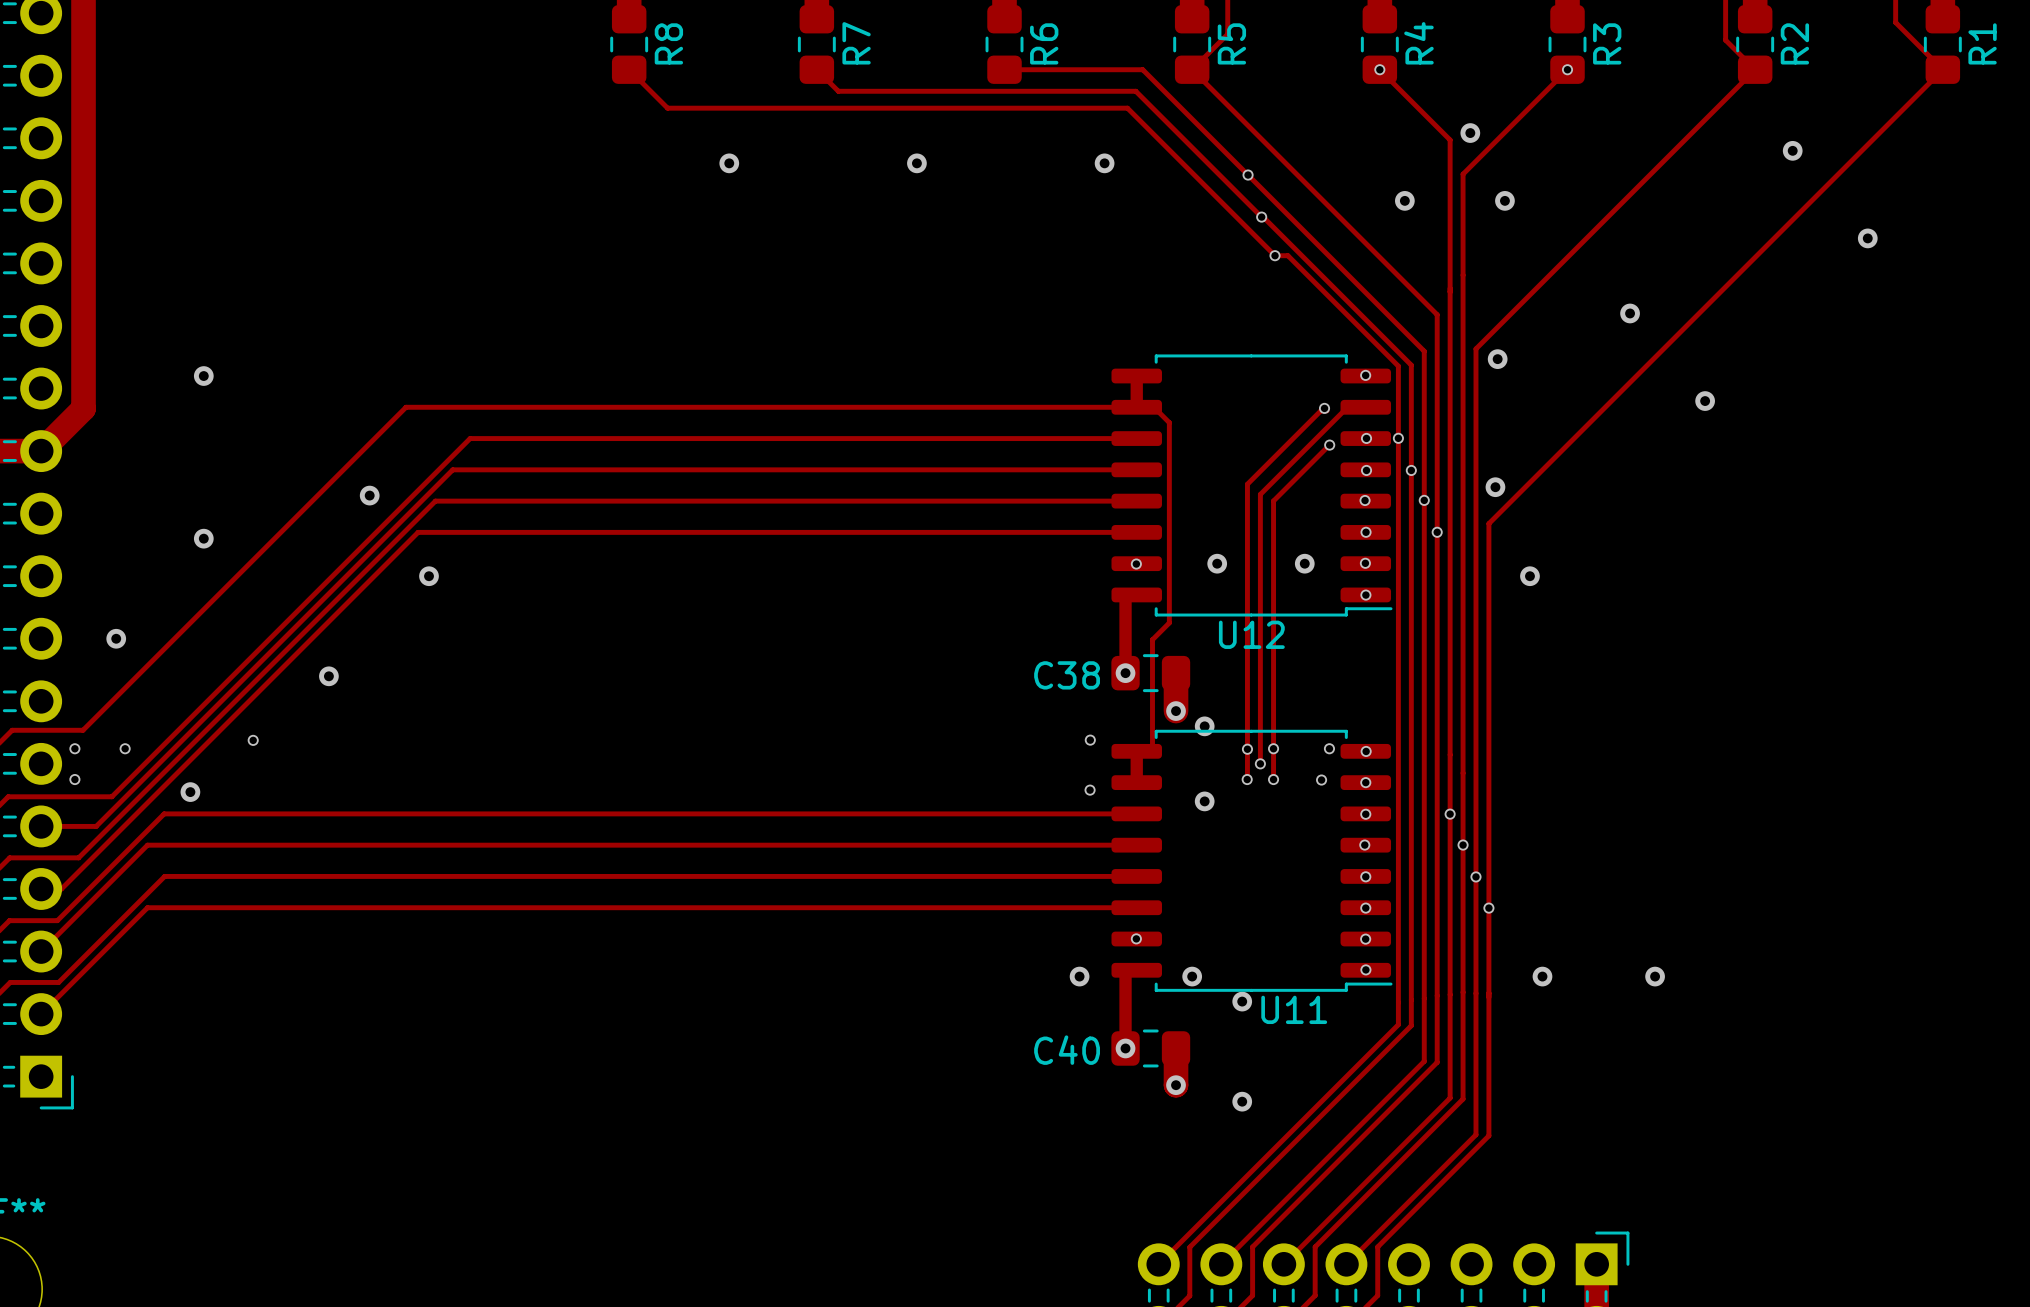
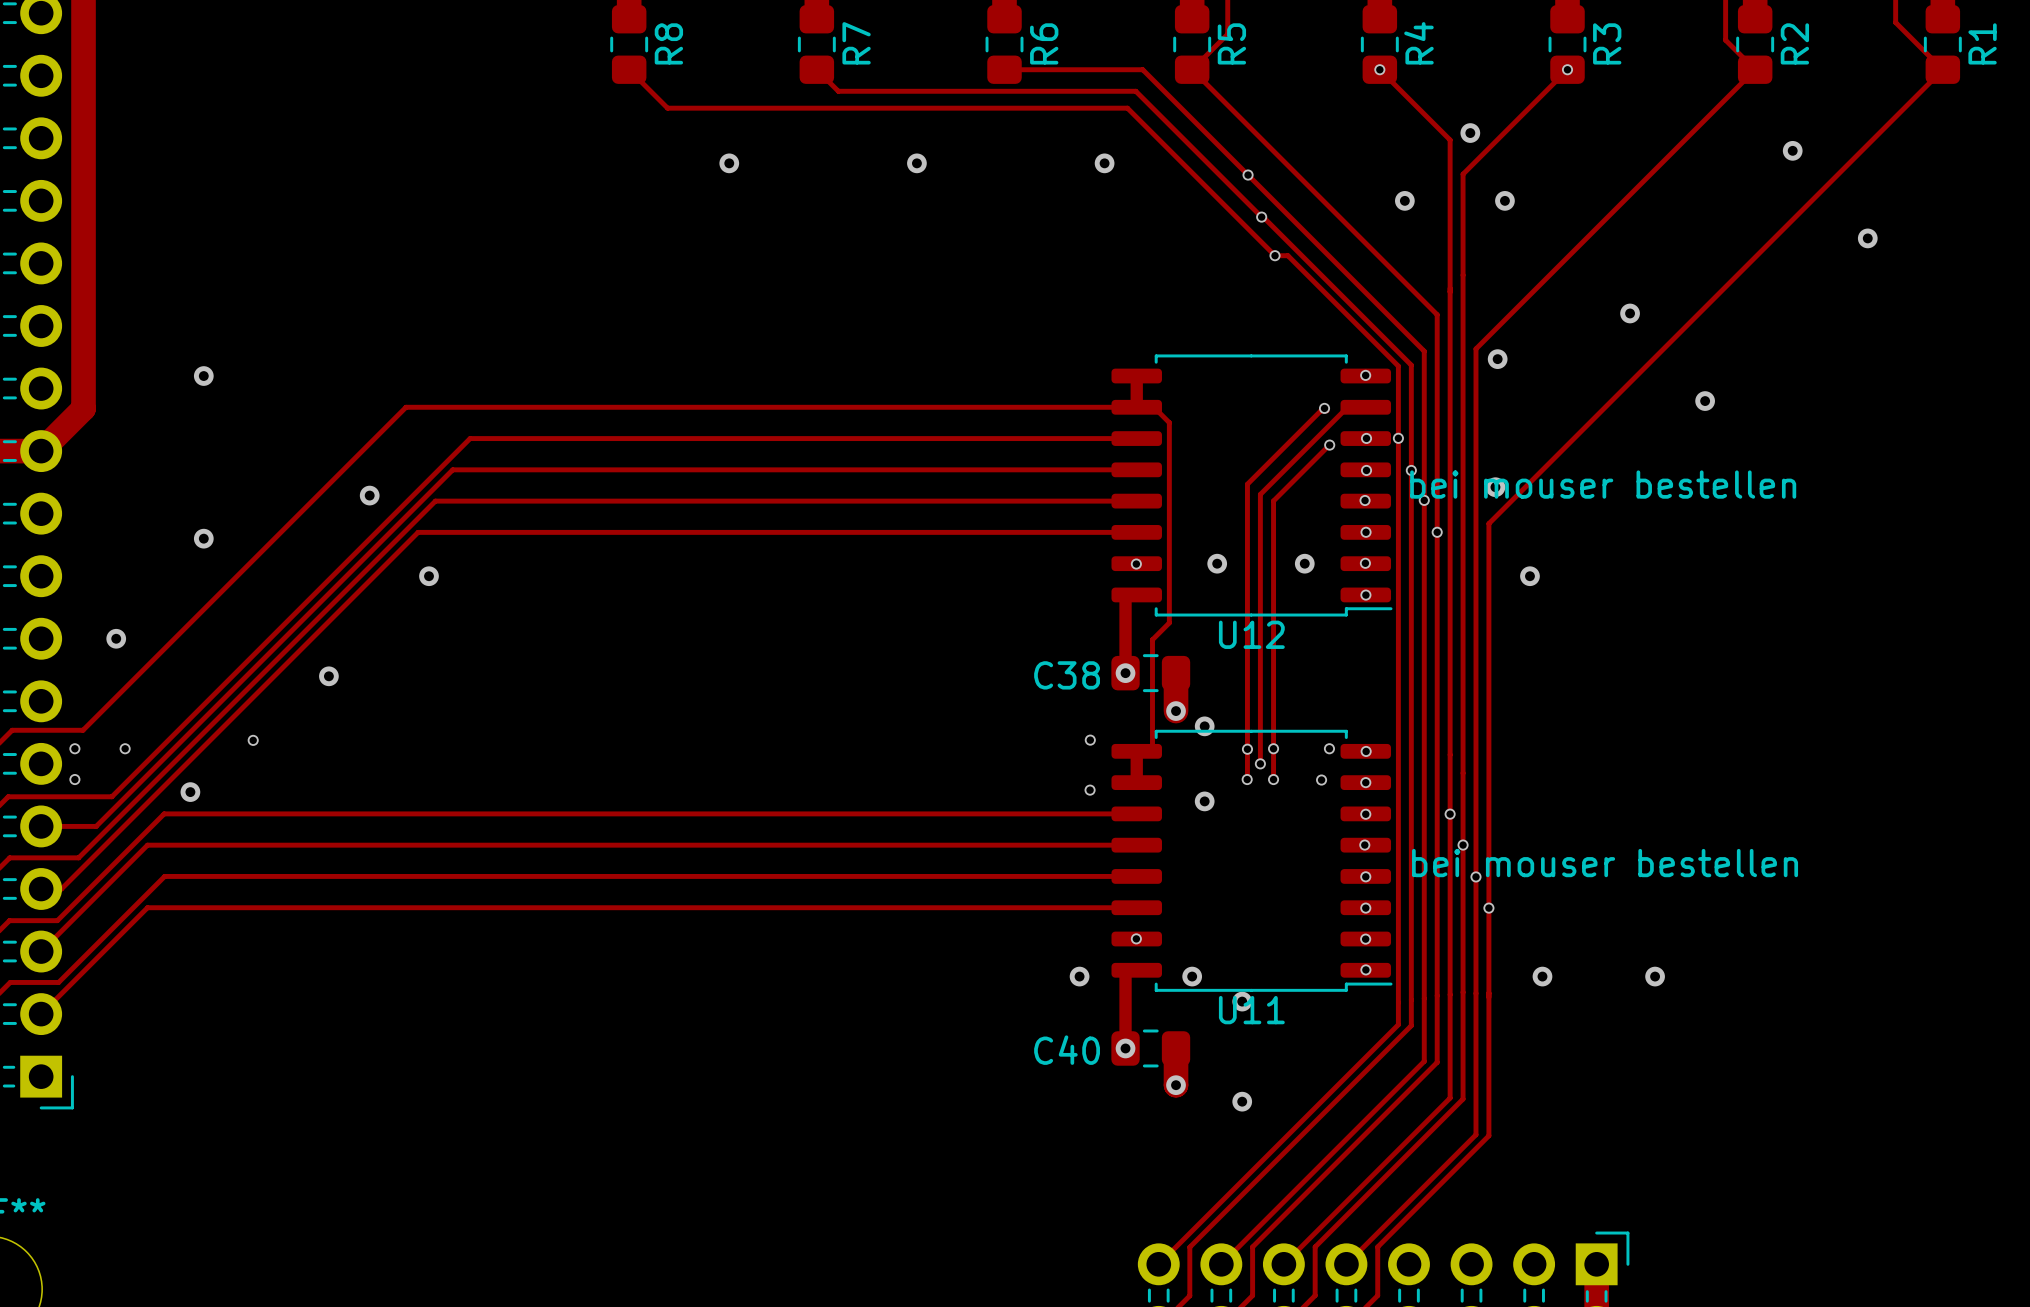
text: none -> bei mouser bestellen (1603, 484)
text: none -> bei mouser bestellen (1605, 863)
U11 name position: U11 (1294, 1009) -> U11 (1251, 1010)

